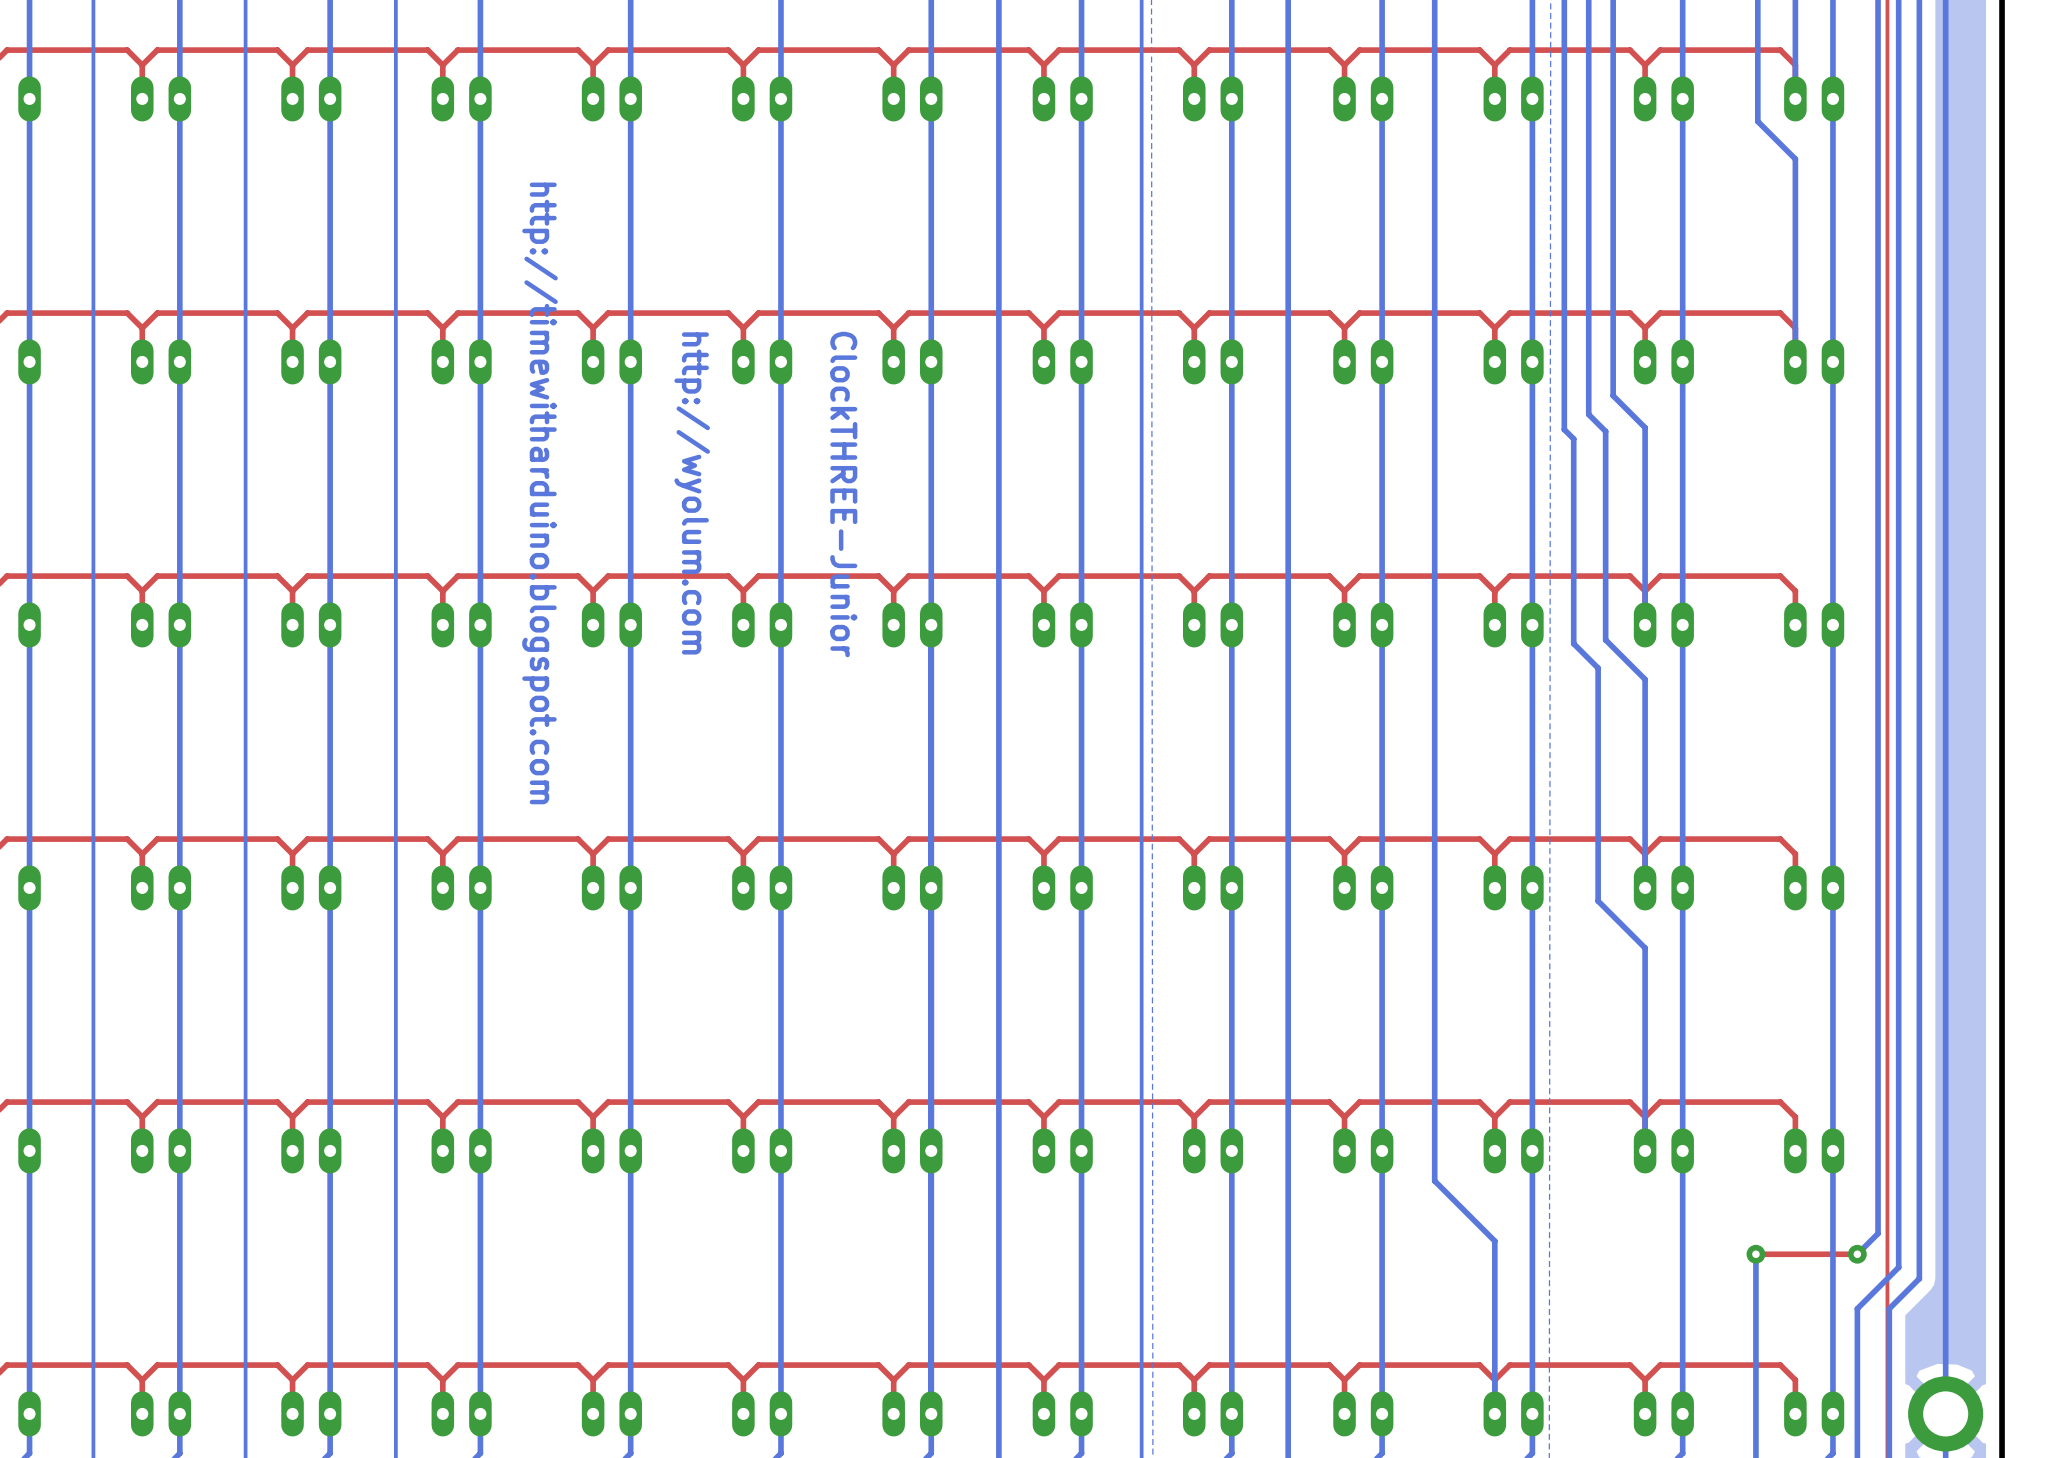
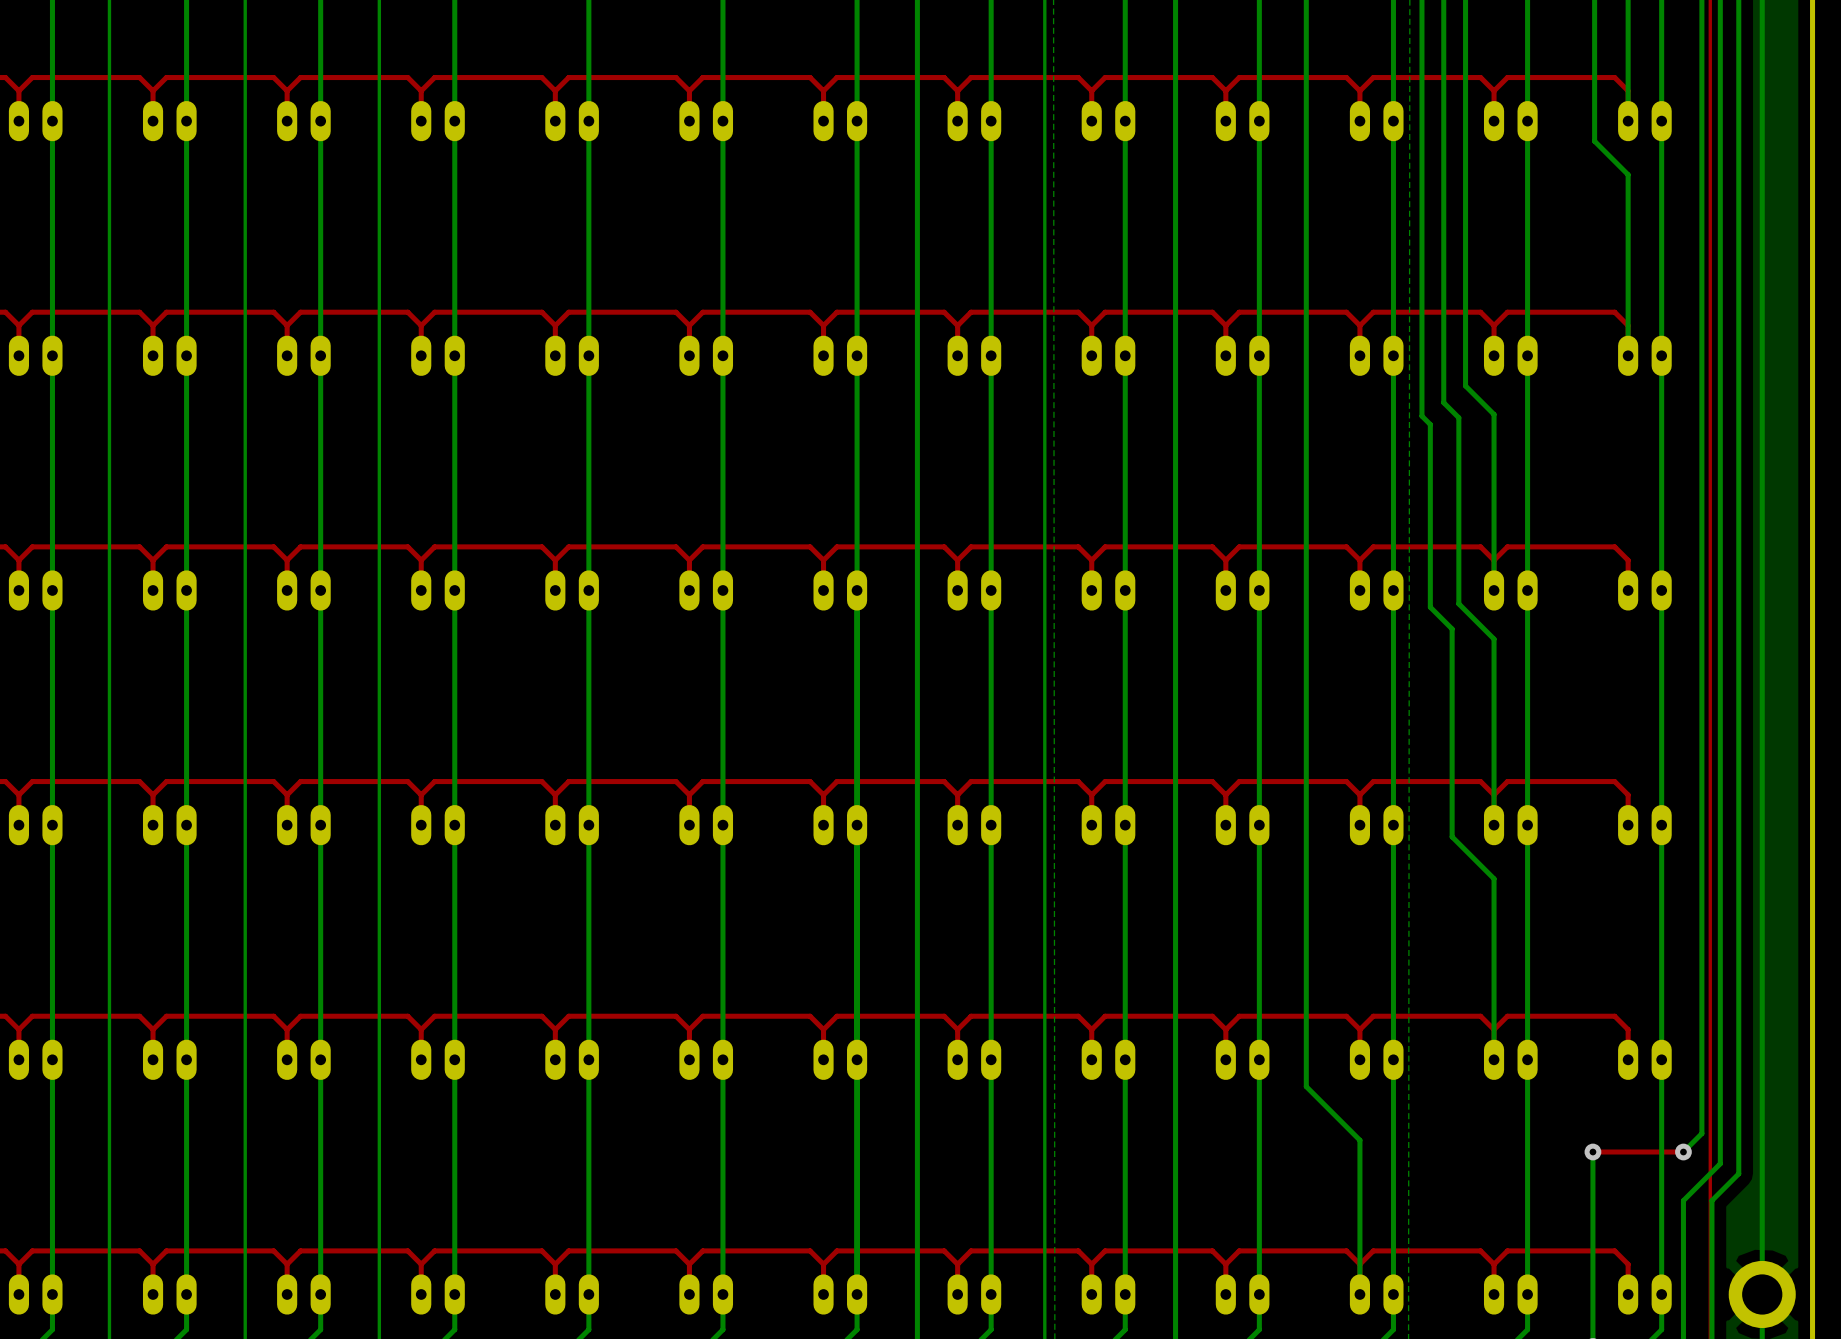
text: http://timewitharduino.blogspot.com (540, 493) -> none
text: http://wyolum.com (692, 493) -> none
text: ClockTHREE-Junior (843, 494) -> none

